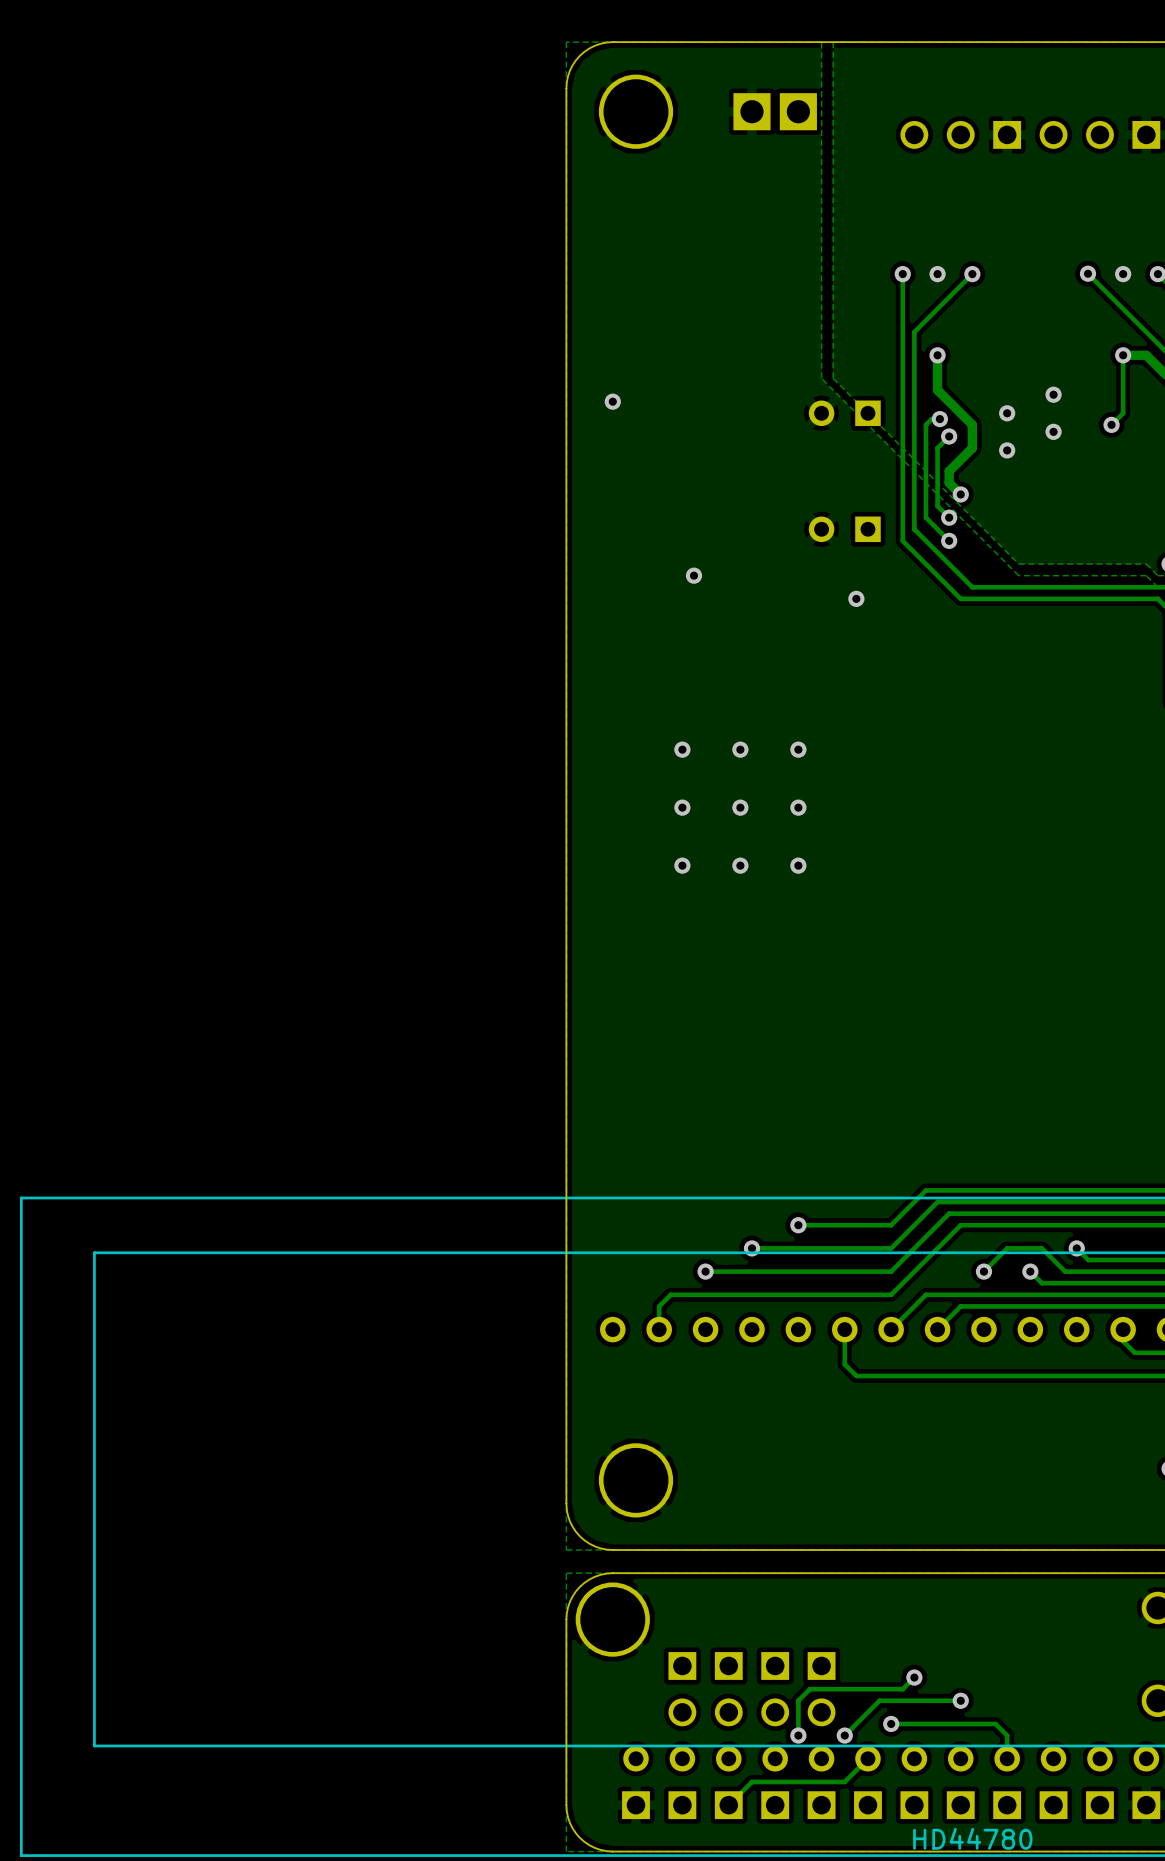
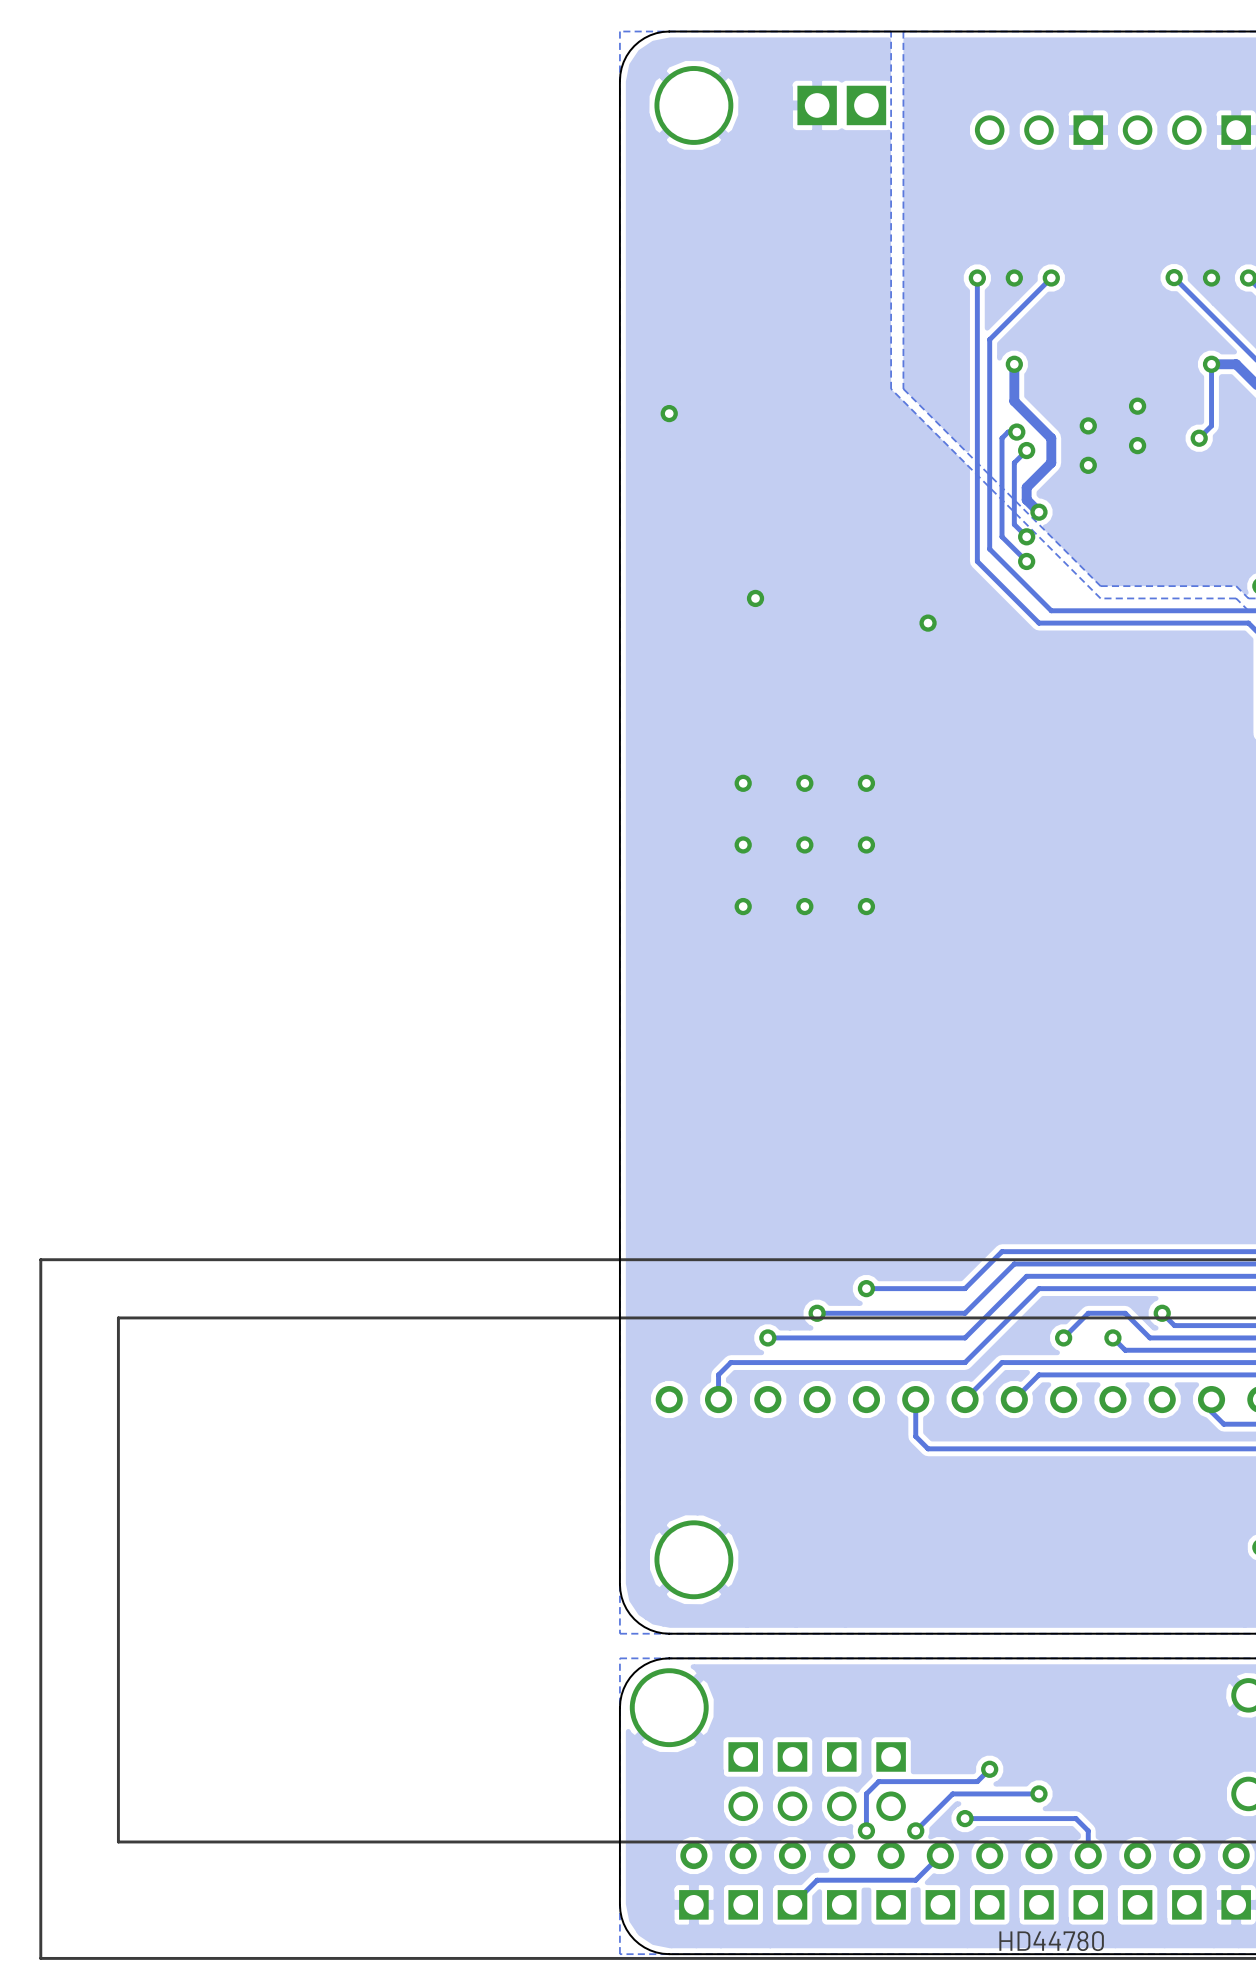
part: (844, 413) -> none
part: (844, 529) -> none

